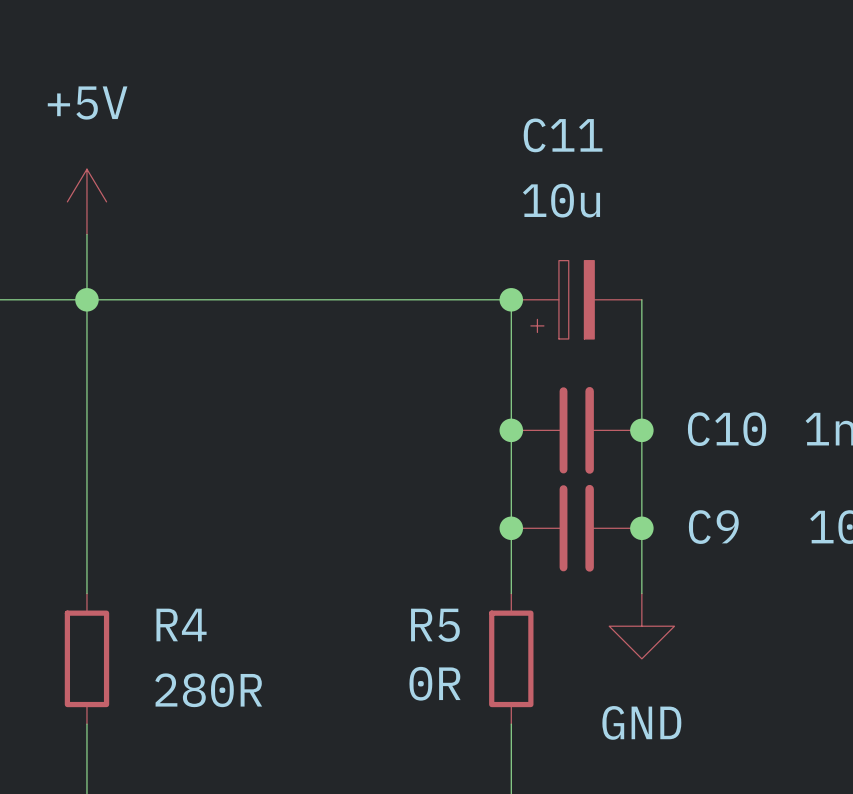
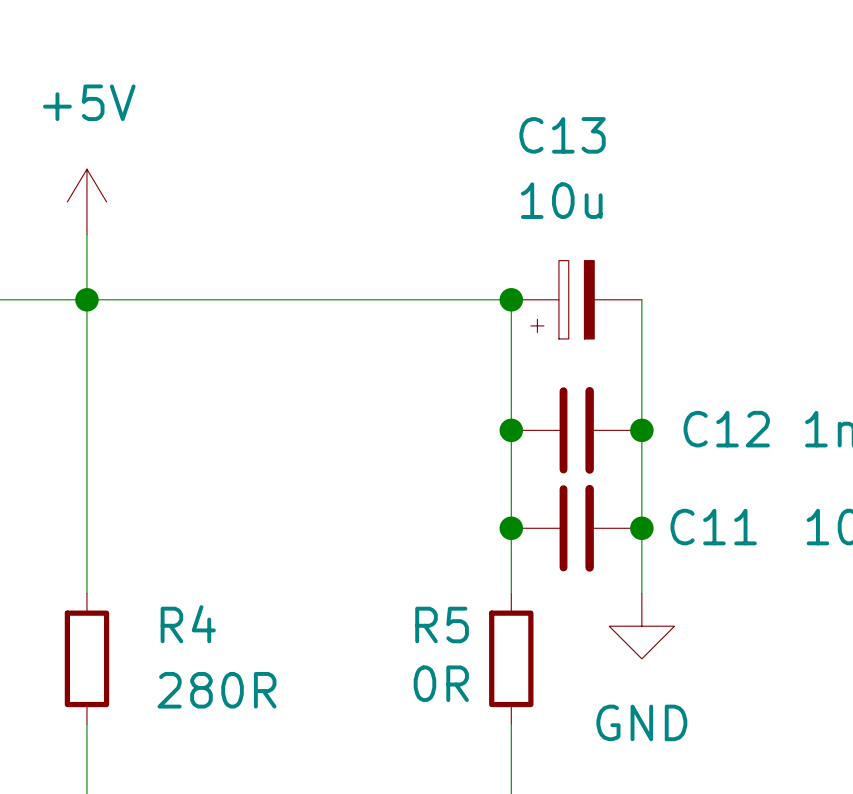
C11 name: C11 (563, 135) -> C13 (562, 135)
C10 name: C10 (727, 429) -> C12 (726, 429)
C9 name: C9 (713, 527) -> C11 (713, 527)

